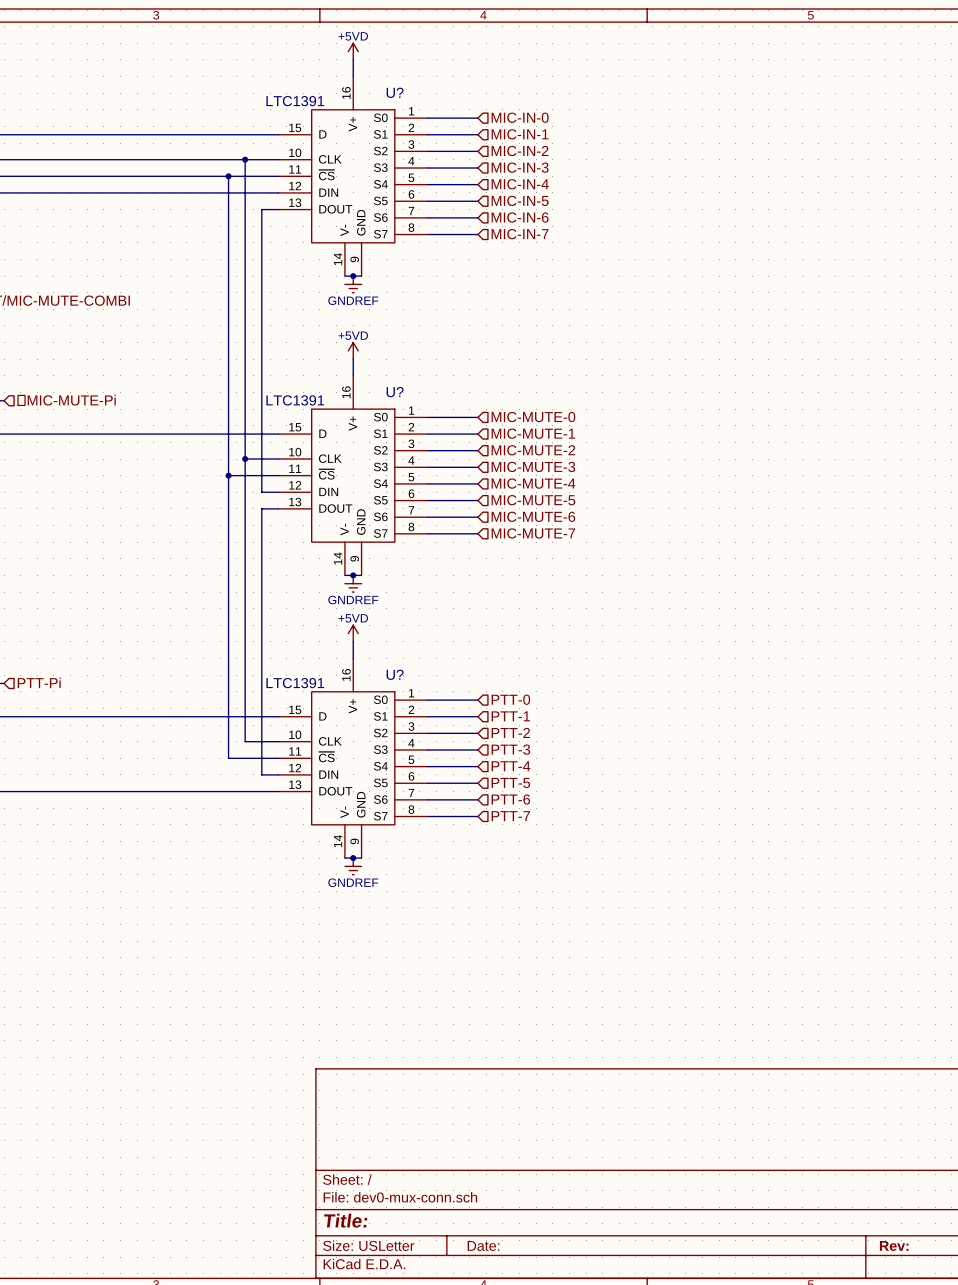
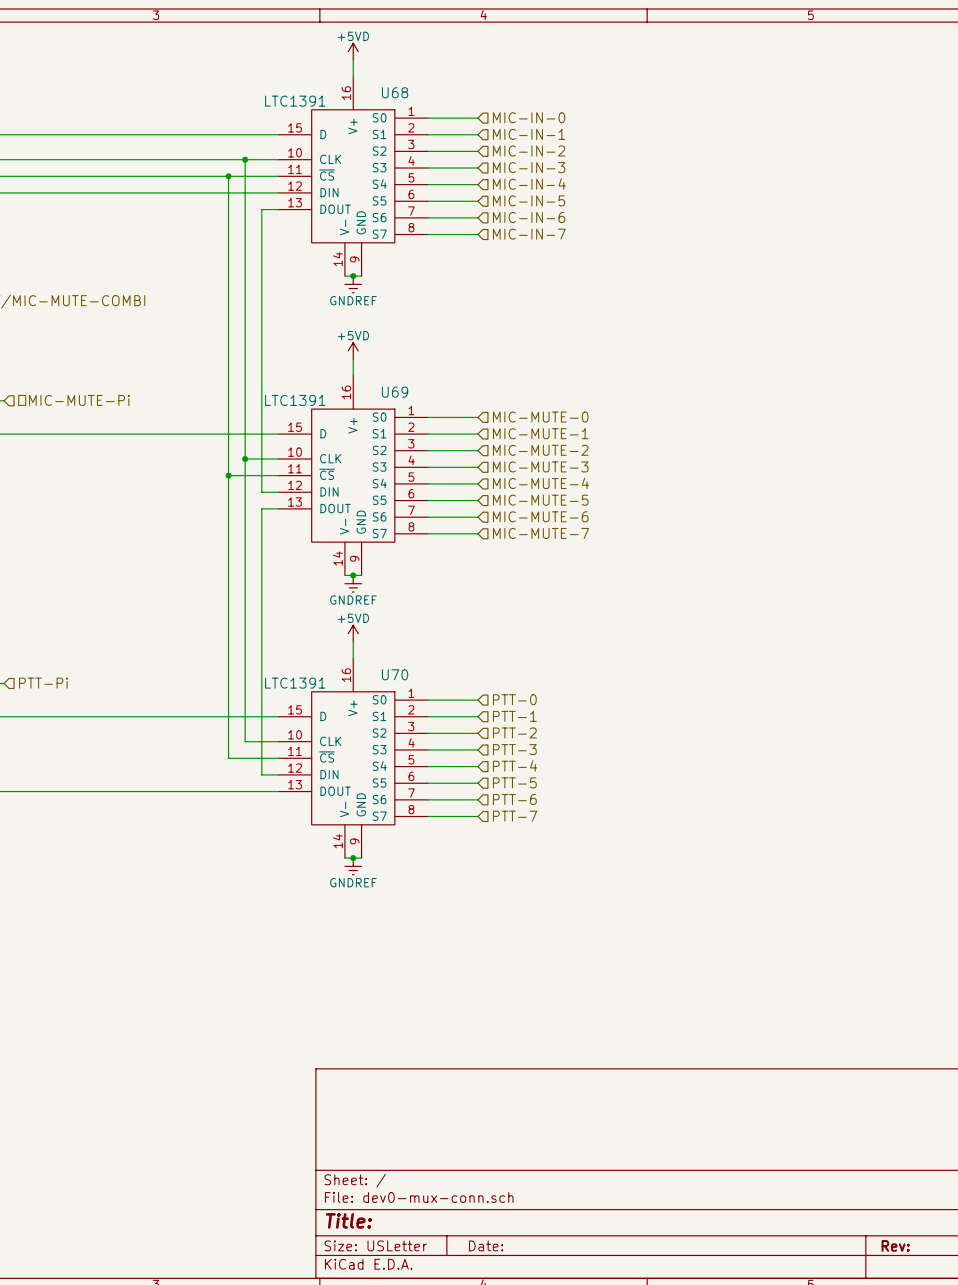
U? name: U? (395, 92) -> U68 (395, 92)
U? name: U? (395, 392) -> U69 (395, 392)
U? name: U? (395, 674) -> U70 (395, 674)

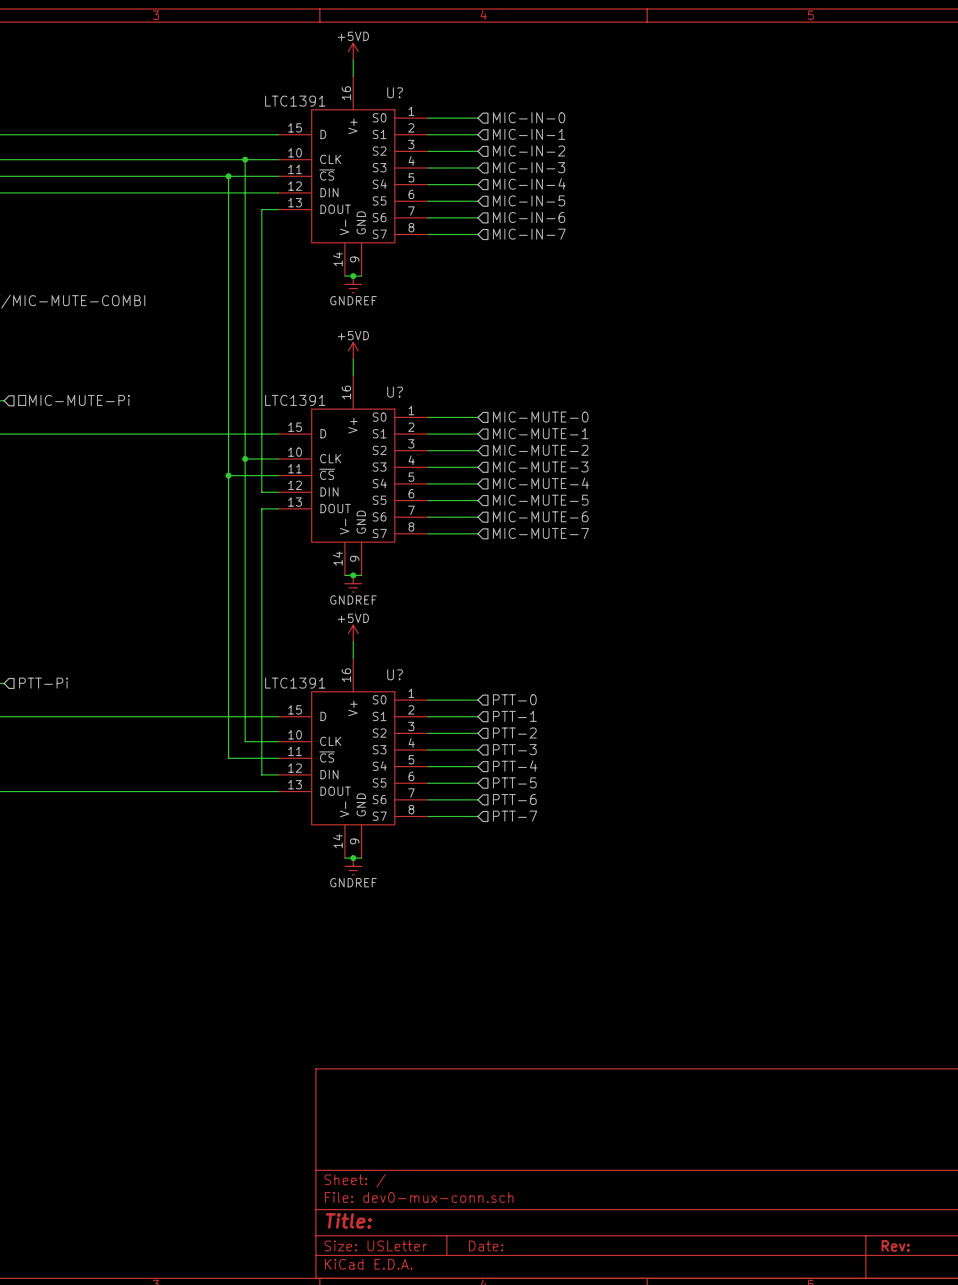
U68 name: U68 (395, 92) -> U? (395, 92)
U69 name: U69 (395, 392) -> U? (395, 392)
U70 name: U70 (395, 674) -> U? (395, 674)

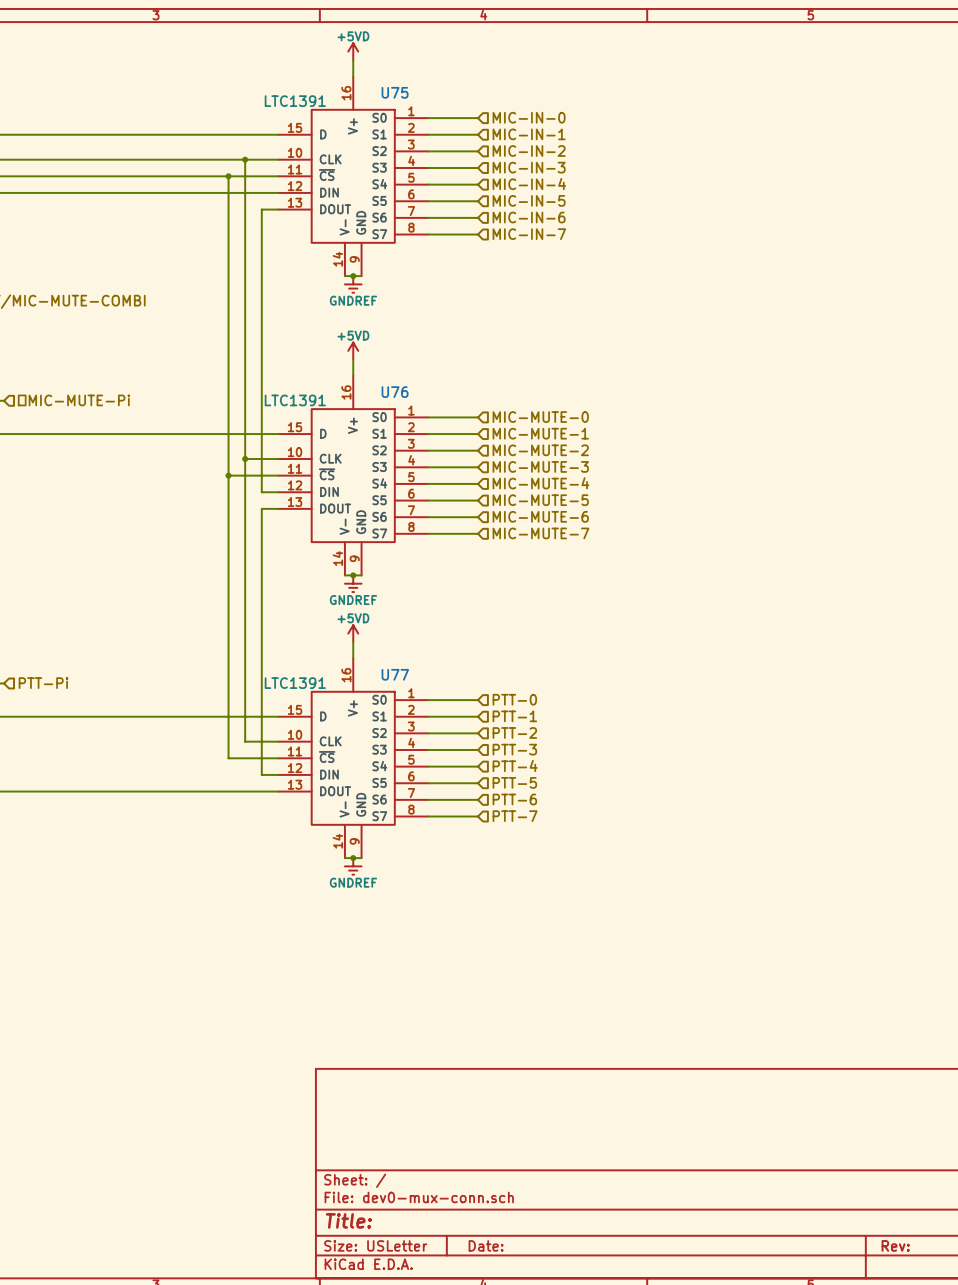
U? name: U? (395, 92) -> U75 (395, 92)
U? name: U? (395, 392) -> U76 (395, 392)
U? name: U? (395, 674) -> U77 (395, 674)

